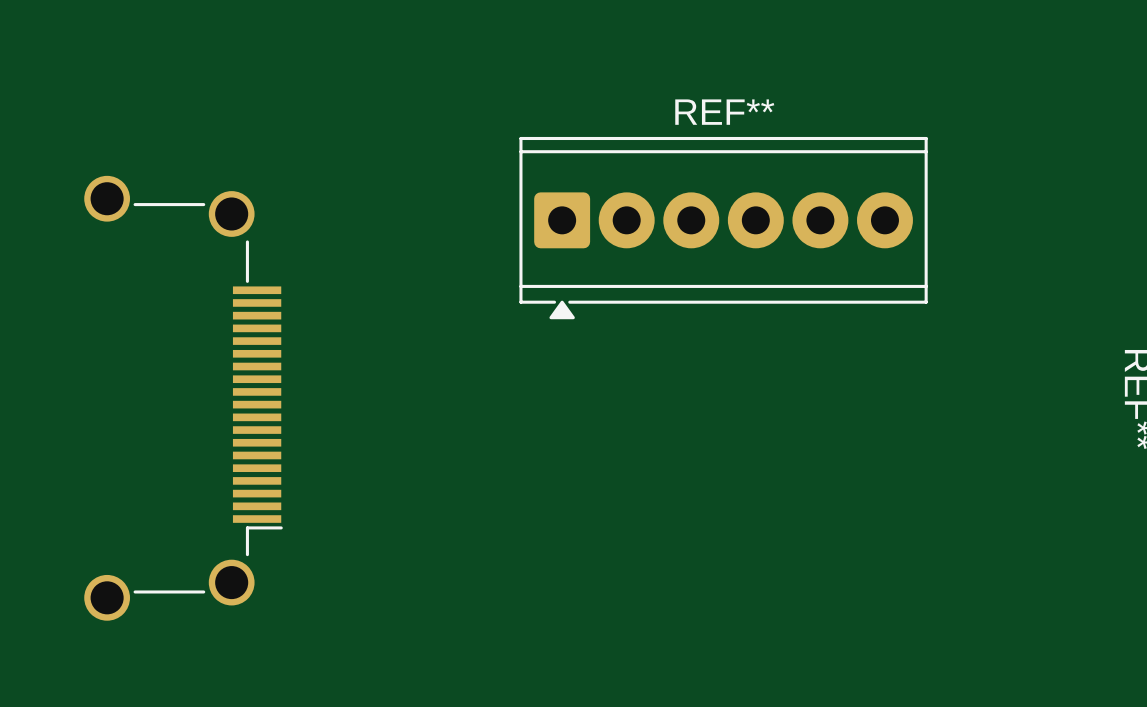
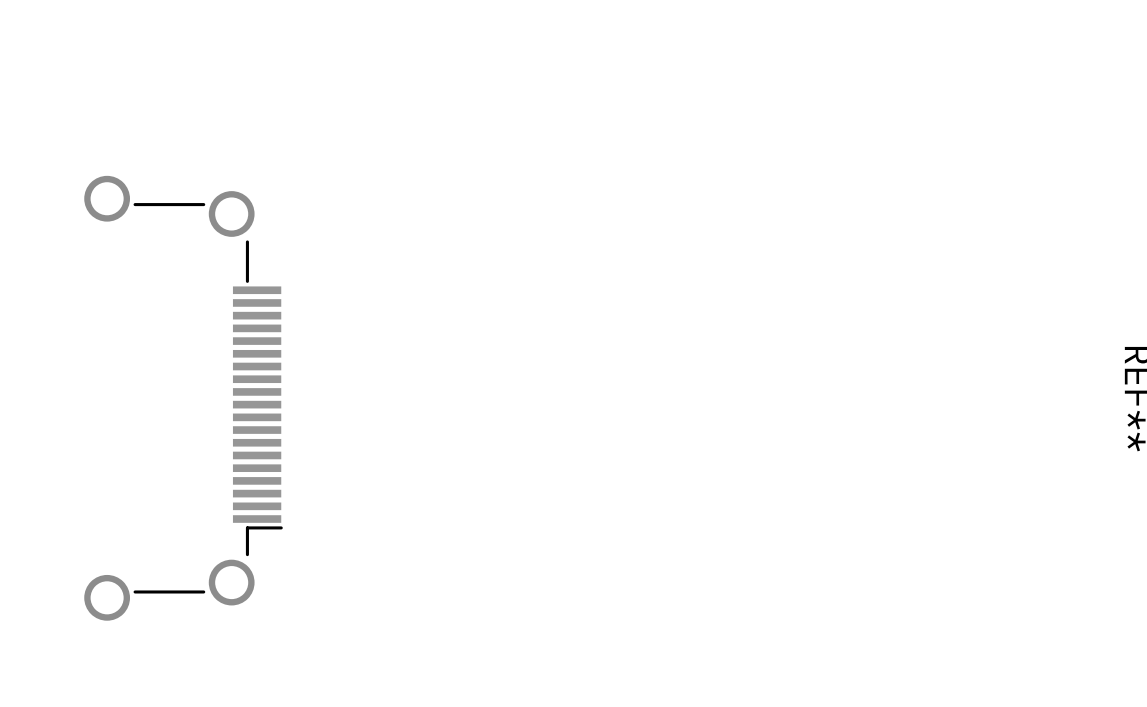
REF**: (723, 228) -> none

